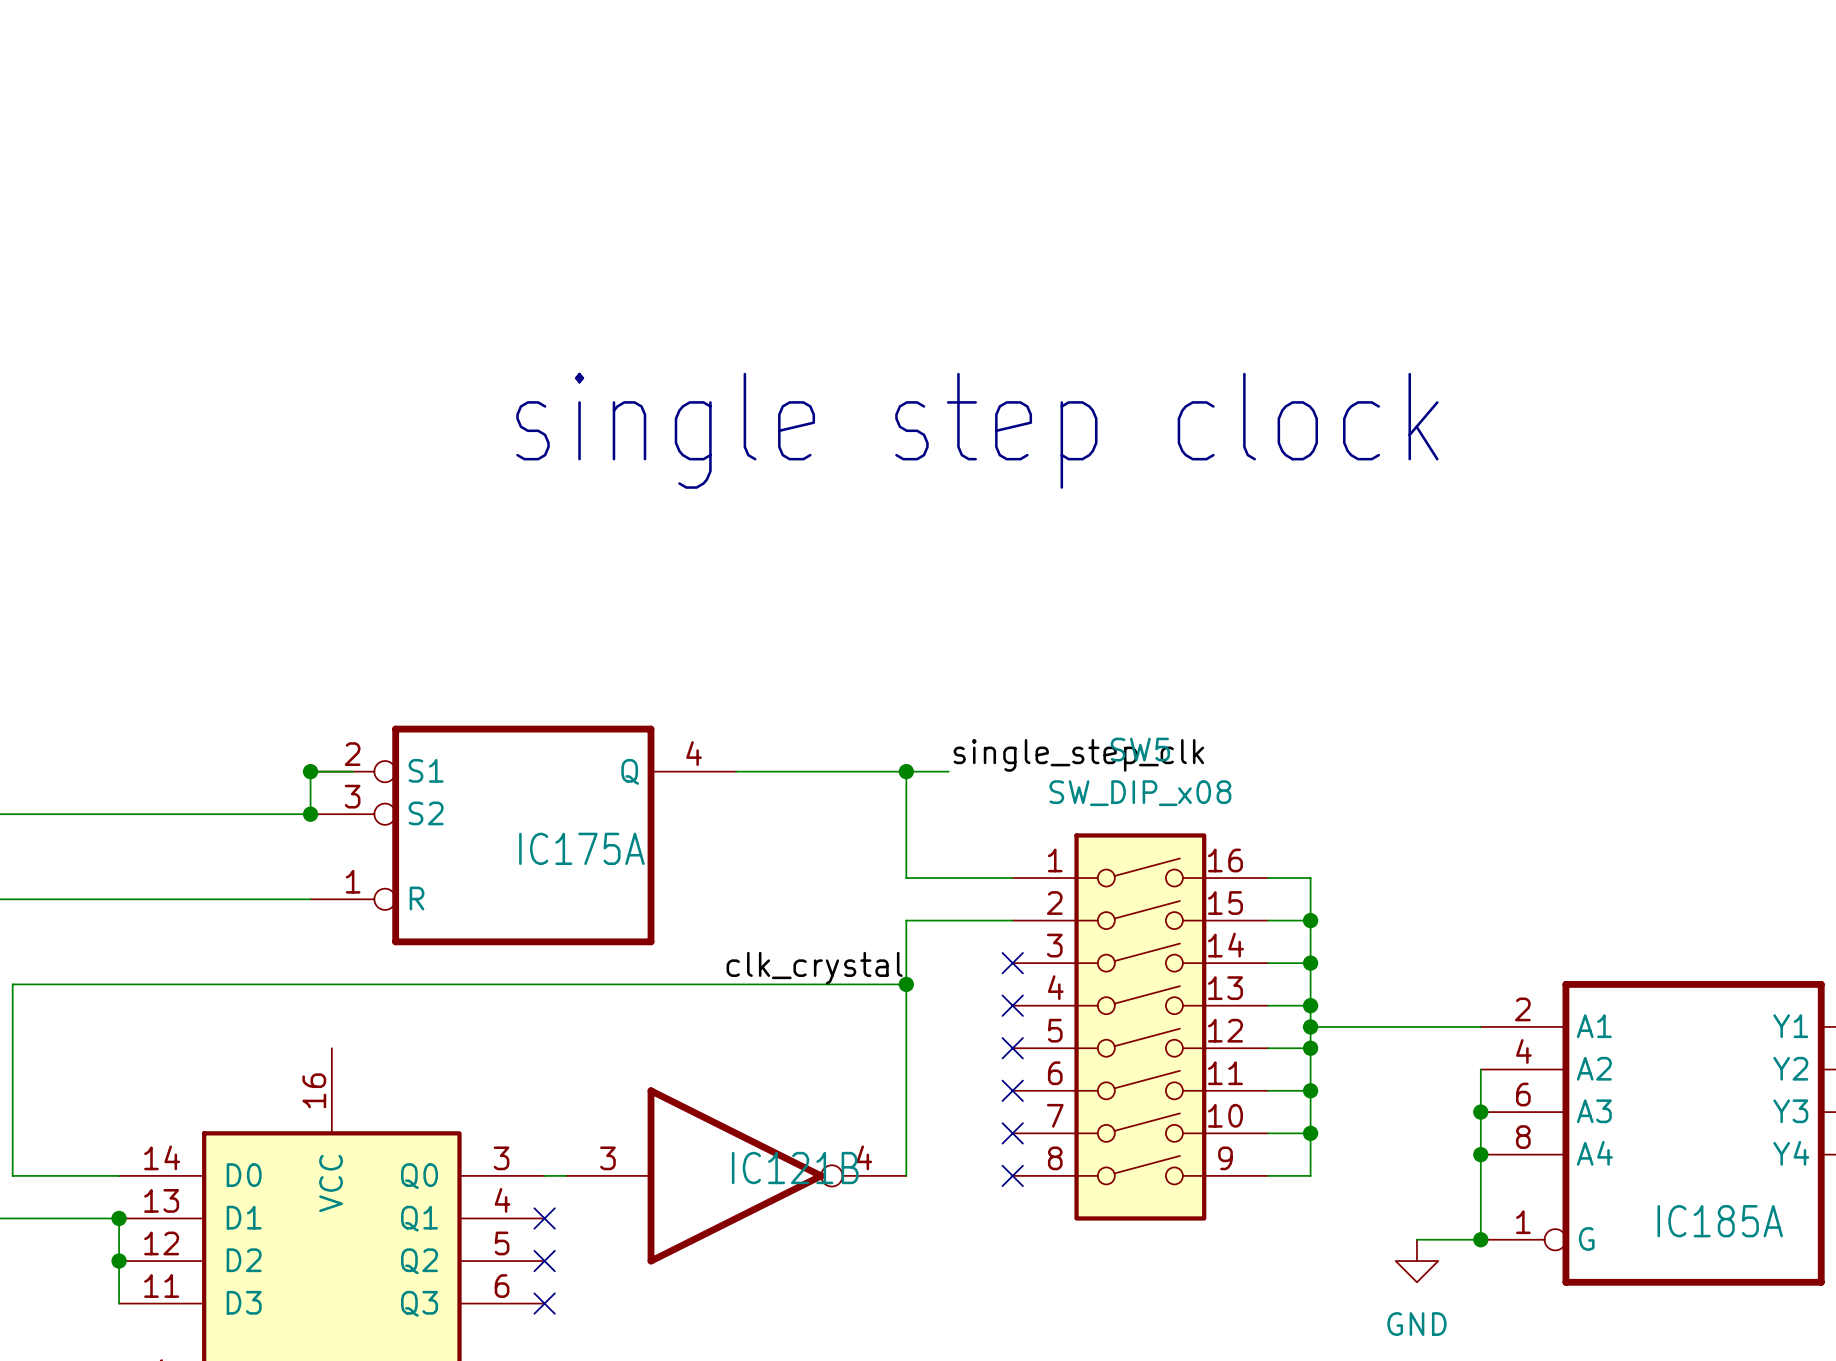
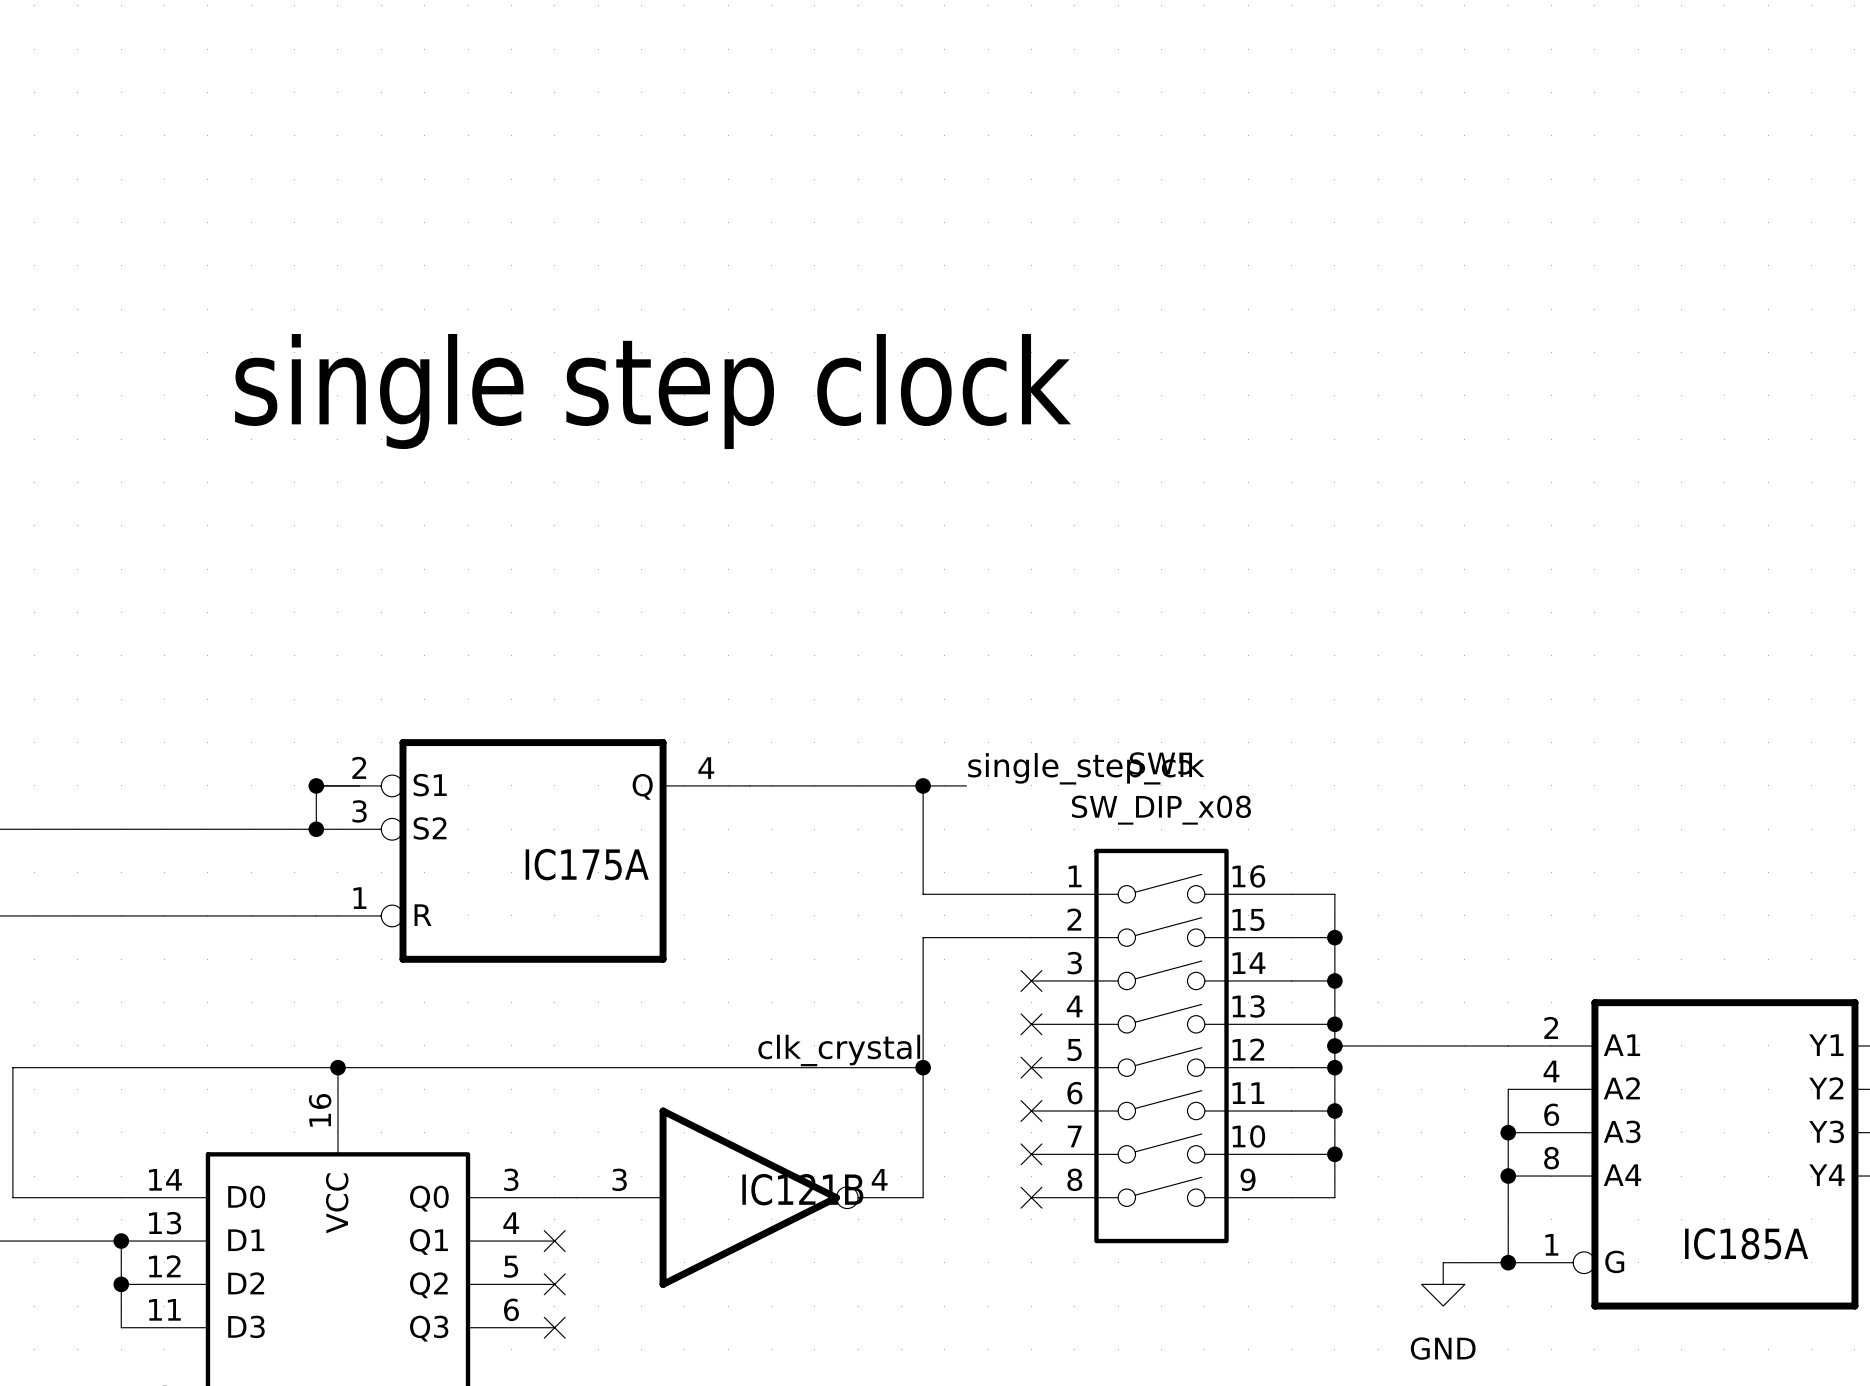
text position: single step clock (977, 430) -> single step clock (653, 391)
label position: clk_crystal (814, 968) -> clk_crystal (839, 1050)
wire: (906, 984) (12, 984) (12, 1048) -> (923, 1067) (12, 1067)
junction position: (906, 984) -> (923, 1067)
junction: none -> (337, 1067)

